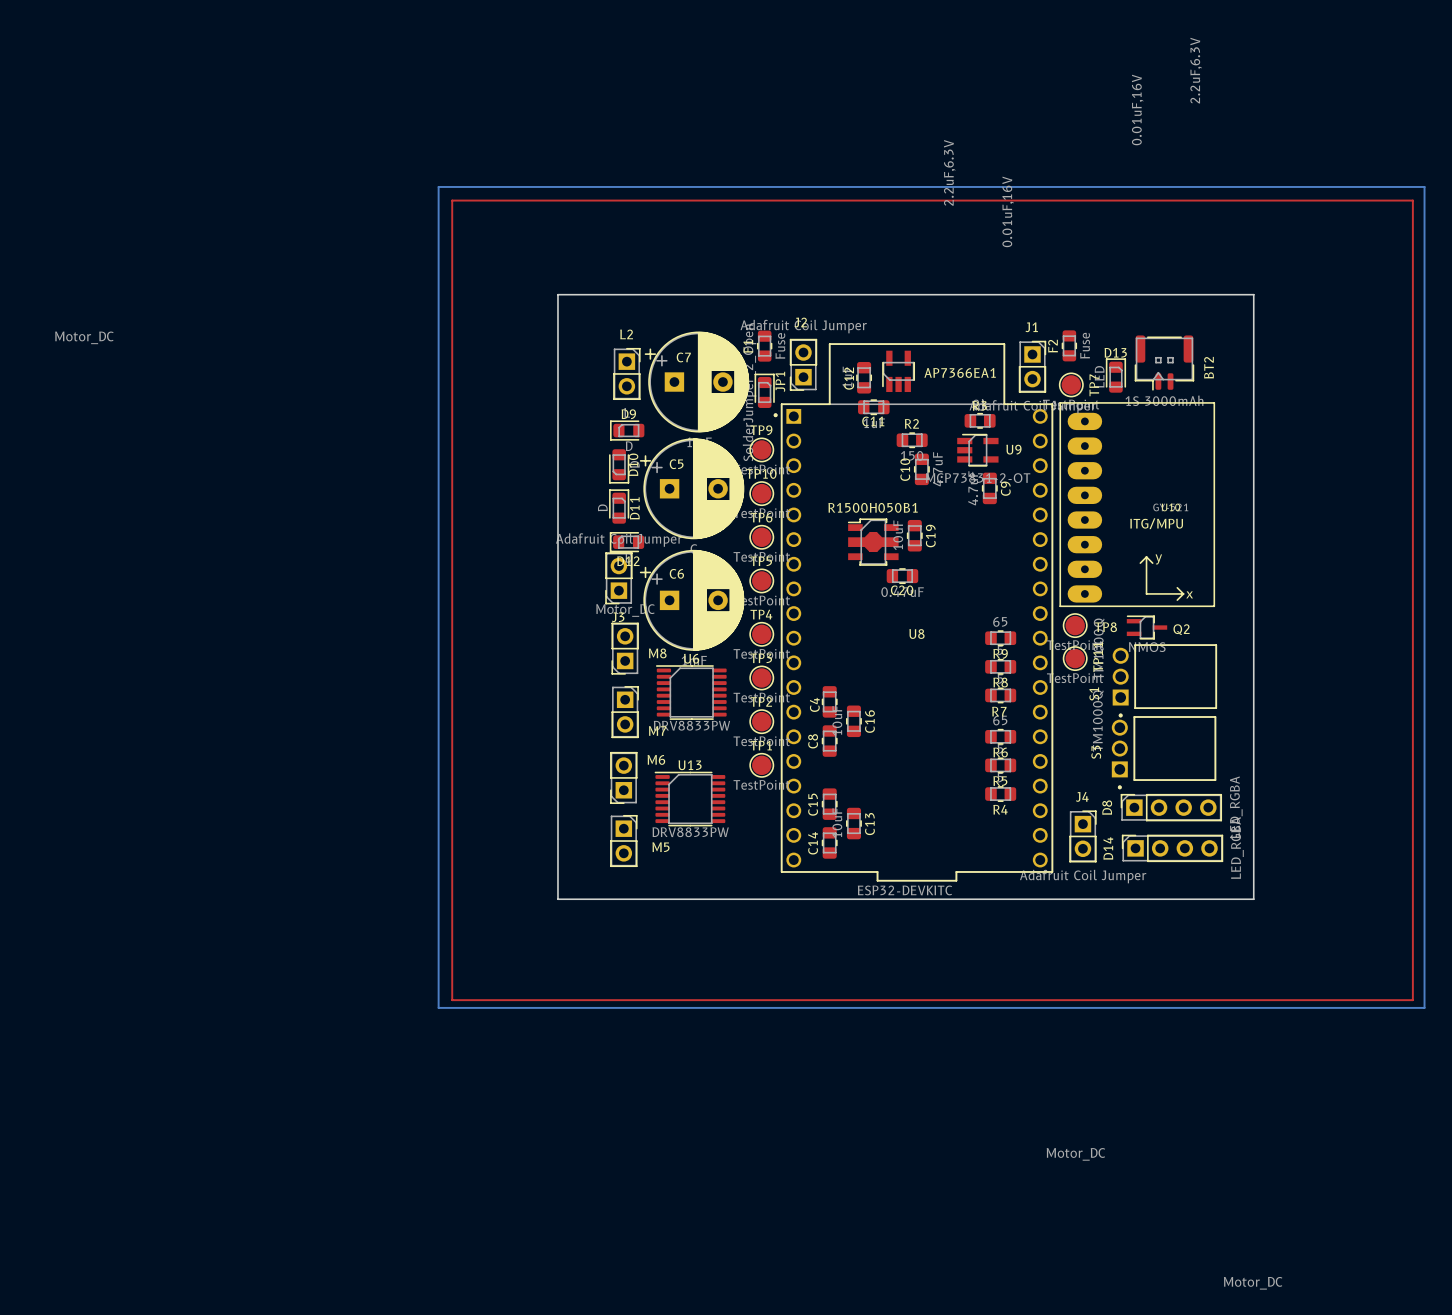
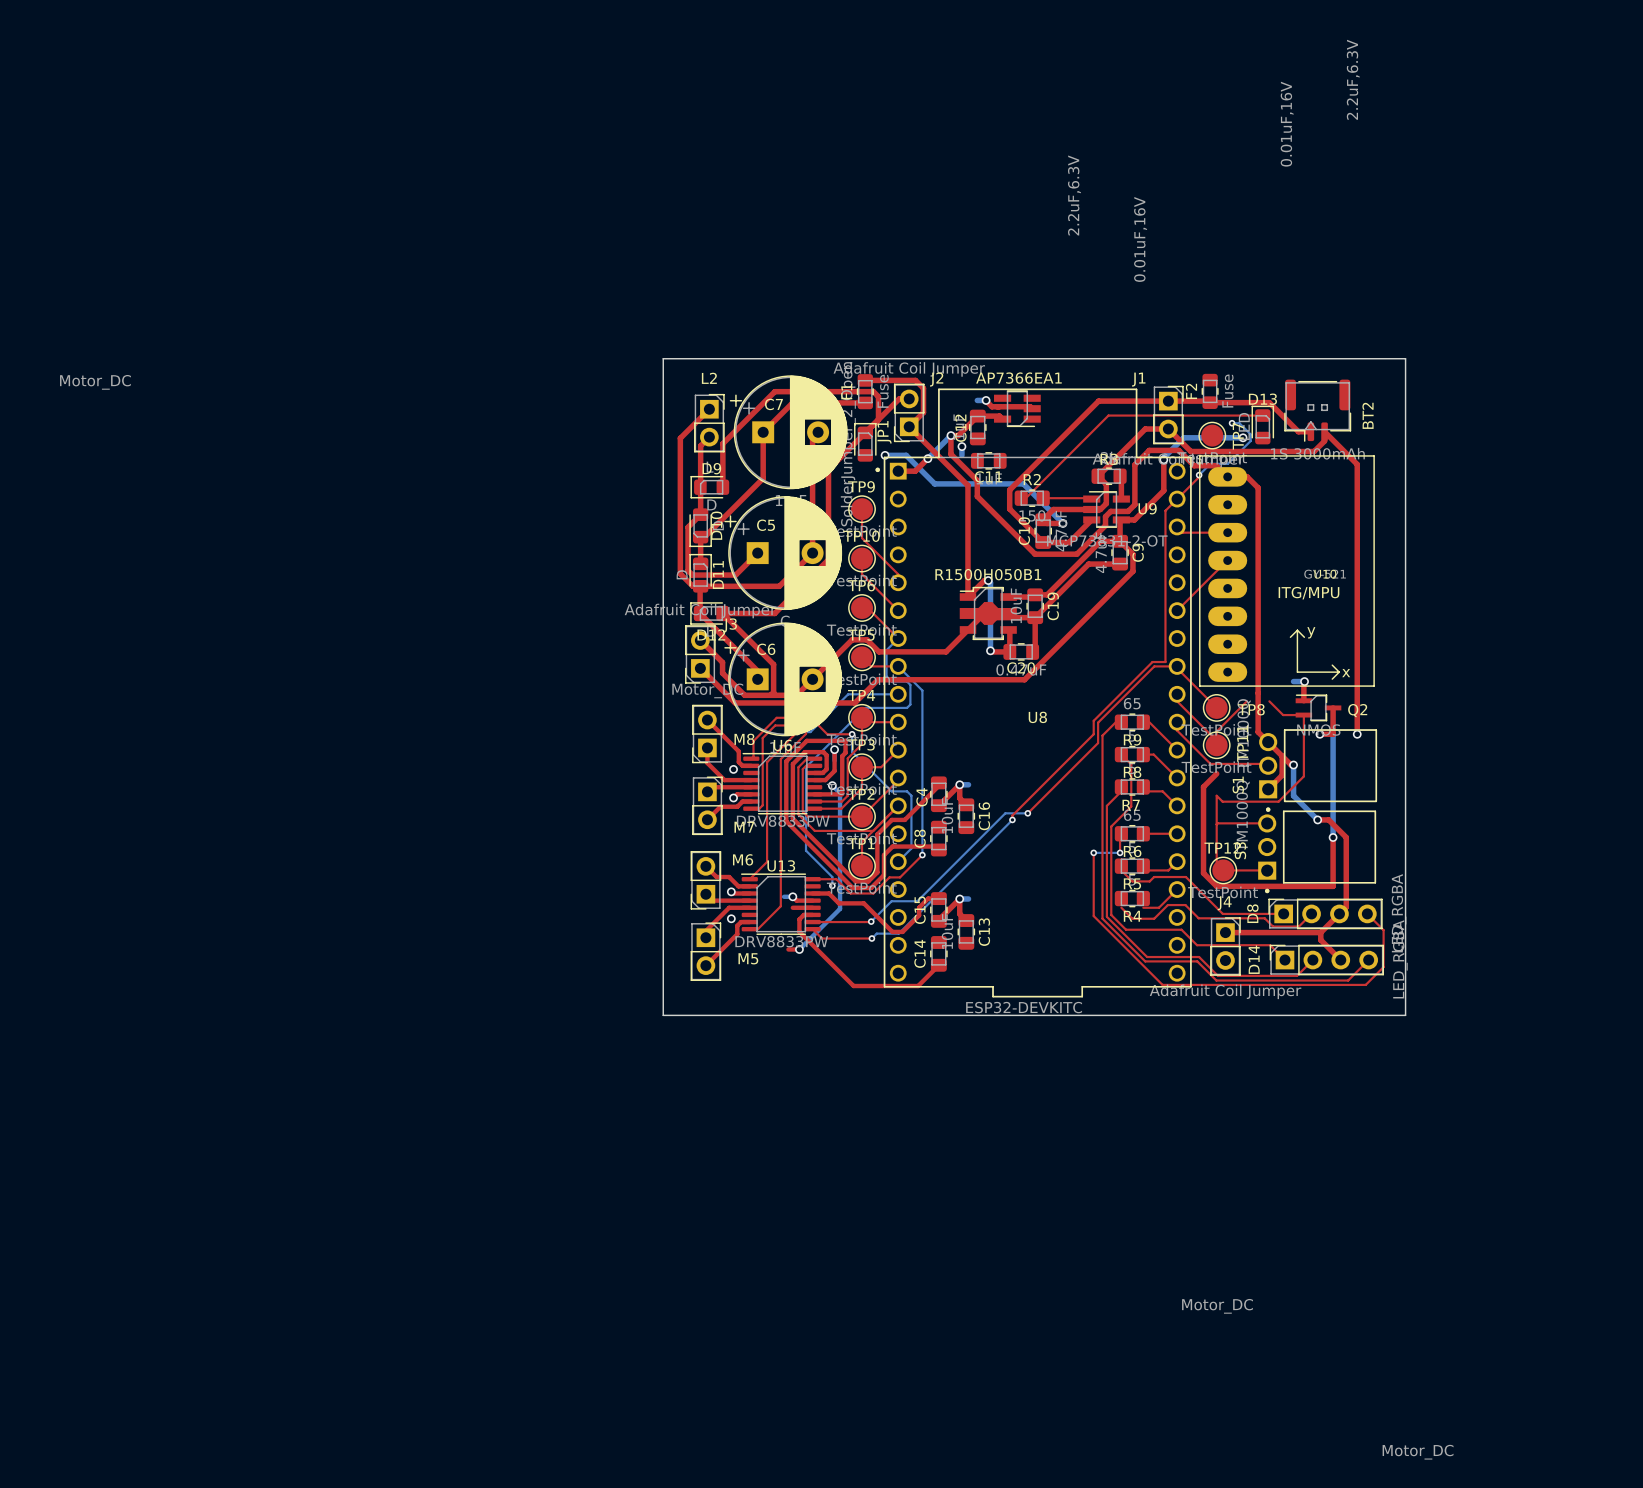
bottom track: (438, 186) (1424, 186) (1424, 1007) (438, 1007) (438, 186) -> none
top track: (452, 200) (1412, 200) (1412, 1000) (452, 1000) (452, 200) -> none
board edge: (557, 294) (1253, 294) (1253, 899) (557, 899) (557, 294) -> (663, 358) (663, 1015) (1405, 1015) (1405, 358) (663, 358)
J2 name position: J2 (800, 322) -> J2 (936, 379)
J1 name position: J1 (1031, 327) -> J1 (1138, 379)
top track: none -> (865, 380) (915, 380) (923, 388) (923, 412) (909, 426) (967, 485) (967, 597) (984, 580) (988, 580)
top track: none -> (909, 398) (899, 398) (828, 469) (828, 559) (774, 613) (722, 613) (773, 664) (773, 692) (770, 695)
bottom track: none -> (977, 400) (986, 400)
top track: none -> (986, 400) (991, 406) (1030, 406) (1032, 408)
via: none -> (986, 400)
top track: none -> (865, 402) (792, 402) (763, 432) (763, 478) (700, 540) (700, 563)
top track: none -> (709, 409) (680, 438) (680, 573) (692, 586) (779, 586) (812, 553) (812, 437) (818, 432)
top track: none -> (1262, 415) (1108, 415) (1025, 498) (1021, 498)
top track: none -> (878, 419) (878, 396) (873, 391) (774, 391) (722, 443) (722, 487)
top track: none -> (1002, 419) (999, 416) (977, 416) (958, 435) (950, 435) (950, 454) (977, 480) (977, 496) (1035, 554) (1076, 554) (1105, 525) (1105, 516) (1110, 511) (1128, 511) (1134, 504) (1134, 464) (1149, 450) (1178, 450) (1194, 465) (1216, 465) (1227, 476) (1247, 476) (1258, 487) (1258, 732) (1291, 765) (1293, 765)
AP7366EA1 rotation: 0° (898, 371) -> 90° counterclockwise (1017, 408)
AP7366EA1 name position: AP7366EA1 (960, 372) -> AP7366EA1 (1018, 378)
bottom track: none -> (1232, 423) (1239, 423) (1250, 434) (1250, 440) (1227, 463) (1210, 463) (1199, 475)
via: none -> (1232, 423)
top track: none -> (1310, 431) (1298, 431) (1269, 402) (1098, 401) (1009, 490) (1009, 509) (1043, 542) (1069, 542) (1091, 519)
bottom track: none -> (950, 435) (927, 458)
via: none -> (950, 435)
top track: none -> (709, 437) (700, 445) (700, 514) (688, 527) (688, 570) (692, 575) (735, 575) (757, 553)
bottom track: none -> (1243, 437) (1183, 437) (1163, 459)
via: none -> (1243, 437)
bottom track: none -> (961, 446) (961, 455)
via: none -> (961, 446)
bottom track: none -> (885, 455) (906, 455) (934, 483) (1023, 483) (1062, 523)
via: none -> (885, 455)
top track: none -> (927, 458) (915, 471) (898, 471)
via: none -> (927, 458)
top track: none -> (1163, 459) (1163, 490) (1134, 519) (1120, 521) (1120, 541)
via: none -> (1163, 459)
top track: none -> (1199, 475) (1165, 510) (1165, 662) (1152, 662) (1093, 720) (1093, 734) (1012, 815) (1012, 819)
via: none -> (1199, 475)
top track: none -> (1120, 476) (1121, 499)
top track: none -> (1043, 498) (1091, 499)
top track: none -> (862, 509) (862, 538) (898, 574) (898, 582)
top track: none -> (1062, 523) (1046, 523) (1043, 519) (1053, 509) (1100, 509) (1106, 503) (1106, 484) (1098, 476) (1145, 429) (1168, 429) (1190, 451) (1314, 451) (1324, 441) (1324, 431) (1357, 464) (1357, 734)
via: none -> (1062, 523)
top track: none -> (1177, 526) (1182, 532) (1227, 532)
top track: none -> (1120, 541) (1100, 541) (1047, 594) (1008, 597)
top track: none -> (1120, 541) (1132, 554) (1132, 571) (1024, 679) (878, 679) (854, 702) (735, 702) (707, 674)
top track: none -> (862, 558) (862, 574) (898, 610)
top track: none -> (1227, 560) (1177, 610)
top track: none -> (1120, 564) (1088, 564) (1035, 617)
bottom track: none -> (988, 580) (990, 582) (990, 650)
via: none -> (988, 580)
top track: none -> (700, 586) (700, 613) (757, 671) (757, 679)
top track: none -> (862, 607) (867, 607) (898, 638)
top track: none -> (1035, 617) (992, 617) (988, 613) (984, 613) (946, 651) (878, 651) (866, 639) (852, 639) (796, 695) (744, 695) (722, 673) (722, 662) (707, 647)
top track: none -> (1035, 617) (1035, 649) (1032, 651)
top track: none -> (1008, 629) (1009, 651) (990, 650)
bottom track: none -> (898, 638) (886, 650) (886, 676) (891, 681) (907, 681) (910, 684) (910, 704) (907, 707) (865, 707) (806, 767) (806, 850) (832, 877) (832, 885)
via: none -> (990, 650)
top track: none -> (862, 657) (871, 666) (898, 666)
bottom track: none -> (898, 666) (922, 690) (922, 855)
bottom track: none -> (1293, 681) (1304, 681)
top track: none -> (1304, 681) (1303, 700)
via: none -> (1304, 681)
bottom track: none -> (898, 694) (848, 694) (810, 732) (797, 732)
top track: none -> (1177, 694) (1177, 701) (1216, 740)
J3 name position: J3 (618, 617) -> J3 (730, 625)
top track: none -> (1246, 701) (1216, 731) (1216, 745)
top track: none -> (1269, 701) (1283, 715) (1303, 715) (1303, 776) (1278, 801) (1222, 801) (1216, 795) (1216, 863) (1223, 870) (1268, 870)
top track: none -> (1216, 707) (1177, 666) (1154, 666) (1098, 722) (1098, 743) (1027, 813)
top track: none -> (1333, 707) (1333, 734) (1319, 734)
Q2 position: (1147, 627) -> (1318, 707)
top track: none -> (1121, 716) (1102, 735) (1102, 918) (1145, 961) (1197, 961) (1216, 980) (1348, 980) (1368, 960)
top track: none -> (1143, 716) (1177, 750)
top track: none -> (707, 720) (738, 751) (738, 762) (742, 765) (751, 765)
top track: none -> (898, 722) (866, 722) (862, 717) (862, 744) (847, 758) (847, 795) (841, 801) (814, 801)
top track: none -> (1177, 722) (1177, 730) (1210, 763) (1266, 763) (1268, 765)
top track: none -> (806, 724) (806, 733) (780, 759) (780, 906) (757, 929) (749, 929)
top track: none -> (788, 725) (775, 725) (762, 738) (762, 805) (759, 808) (751, 808)
top track: none -> (797, 732) (767, 762) (767, 861) (749, 879)
top track: none -> (852, 734) (827, 734) (810, 717) (776, 717) (753, 741) (753, 756) (751, 758)
bottom track: none -> (852, 734) (852, 751) (891, 791) (907, 791) (911, 795) (911, 848) (898, 861)
via: none -> (852, 734)
via: none -> (1319, 734)
bottom track: none -> (1333, 734) (1333, 837)
via: none -> (1357, 734)
top track: none -> (707, 747) (707, 763) (724, 780) (751, 780)
top track: none -> (834, 749) (834, 770) (825, 780) (814, 780)
via: none -> (834, 749)
top track: none -> (898, 750) (881, 767) (862, 767) (862, 788) (841, 808) (814, 808)
top track: none -> (1121, 754) (1131, 764) (1131, 806) (1111, 826) (1111, 914) (1126, 929) (1181, 929) (1197, 945) (1270, 945) (1284, 960)
top track: none -> (1143, 754) (1153, 754) (1177, 777)
top track: none -> (1282, 756) (1282, 775) (1268, 789)
top track: none -> (814, 758) (806, 758) (798, 767) (798, 814) (814, 830) (873, 830)
top track: none -> (814, 765) (806, 765) (802, 769) (802, 811) (807, 816) (862, 816) (898, 780) (898, 777)
bottom track: none -> (1293, 765) (1293, 795) (1317, 819)
via: none -> (1293, 765)
via: none -> (733, 769)
top track: none -> (814, 772) (822, 772) (826, 769) (826, 755) (823, 752) (804, 752) (792, 764) (792, 818) (855, 881) (868, 881) (877, 872) (877, 834) (891, 819) (904, 819) (938, 785) (938, 782)
top track: none -> (1216, 773) (1203, 786) (1203, 873) (1216, 886) (1333, 886) (1333, 837)
bottom track: none -> (959, 784) (968, 784)
via: none -> (959, 784)
bottom track: none -> (832, 785) (840, 793) (840, 908) (799, 949)
via: none -> (832, 785)
top track: none -> (751, 787) (712, 787) (707, 791)
top track: none -> (1121, 791) (1106, 805) (1106, 916) (1147, 957) (1199, 957) (1217, 975) (1297, 975) (1312, 960)
top track: none -> (1143, 791) (1162, 791) (1177, 805)
top track: none -> (751, 794) (737, 794) (733, 797)
top track: none -> (814, 794) (842, 793) (842, 756) (845, 752) (845, 740) (806, 740) (786, 761) (786, 821) (852, 888) (871, 888) (883, 875) (883, 855) (892, 846) (935, 846) (938, 849)
via: none -> (733, 797)
top track: none -> (751, 801) (742, 801) (737, 806) (720, 806) (707, 819)
top track: none -> (966, 804) (959, 798) (959, 784) (938, 805)
top track: none -> (898, 805) (862, 842) (862, 866)
bottom track: none -> (1027, 813) (1005, 813) (917, 901) (891, 901) (871, 921)
via: none -> (1027, 813)
bottom track: none -> (1012, 819) (898, 933) (876, 933) (871, 938)
via: none -> (1012, 819)
top track: none -> (1317, 819) (1328, 819) (1346, 837) (1346, 907) (1320, 932)
via: none -> (1317, 819)
top track: none -> (1268, 823) (1216, 824)
top track: none -> (1121, 833) (1120, 852)
top track: none -> (1143, 833) (1177, 833)
via: none -> (1333, 837)
top track: none -> (1093, 852) (1093, 916) (1162, 984) (1365, 984) (1383, 967) (1383, 930) (1367, 913)
bottom track: none -> (1093, 852) (1120, 852)
via: none -> (1093, 852)
via: none -> (1120, 852)
top track: none -> (922, 855) (900, 877) (889, 877) (873, 893) (850, 893) (836, 879) (812, 879)
via: none -> (922, 855)
top track: none -> (1177, 861) (1168, 870) (1143, 870)
top track: none -> (705, 866) (716, 877) (729, 877) (738, 886) (749, 886)
top track: none -> (1121, 870) (1132, 881) (1149, 881) (1154, 877) (1185, 877) (1222, 913) (1283, 913)
TP12: none -> TestPoint (1223, 870)
via: none -> (832, 885)
top track: none -> (1177, 889) (1158, 907) (1143, 907)
top track: none -> (731, 891) (749, 893)
via: none -> (731, 891)
top track: none -> (812, 893) (829, 893) (838, 903) (863, 903) (892, 931) (902, 931) (919, 915) (919, 907) (928, 898) (938, 898)
top track: none -> (705, 894) (712, 900) (749, 900)
bottom track: none -> (784, 896) (792, 896)
top track: none -> (792, 896) (796, 900) (812, 900)
via: none -> (792, 896)
bottom track: none -> (959, 898) (968, 898)
via: none -> (959, 898)
top track: none -> (749, 907) (729, 907) (705, 930) (705, 937)
top track: none -> (792, 907) (812, 907)
top track: none -> (1121, 907) (1132, 918) (1154, 918) (1167, 905) (1185, 905) (1198, 918) (1264, 918) (1272, 926) (1298, 926) (1311, 913)
top track: none -> (812, 914) (803, 914) (799, 919) (799, 931) (853, 986) (918, 986) (938, 965)
via: none -> (731, 918)
top track: none -> (749, 922) (741, 922) (737, 925) (737, 934) (705, 965)
top track: none -> (871, 921) (812, 922)
via: none -> (871, 921)
top track: none -> (938, 921) (959, 898) (959, 913) (965, 921)
top track: none -> (812, 929) (821, 938) (871, 938)
top track: none -> (1225, 932) (1320, 932)
top track: none -> (1320, 932) (1320, 940) (1340, 960)
via: none -> (871, 938)
top track: none -> (788, 949) (799, 949)
via: none -> (799, 949)

